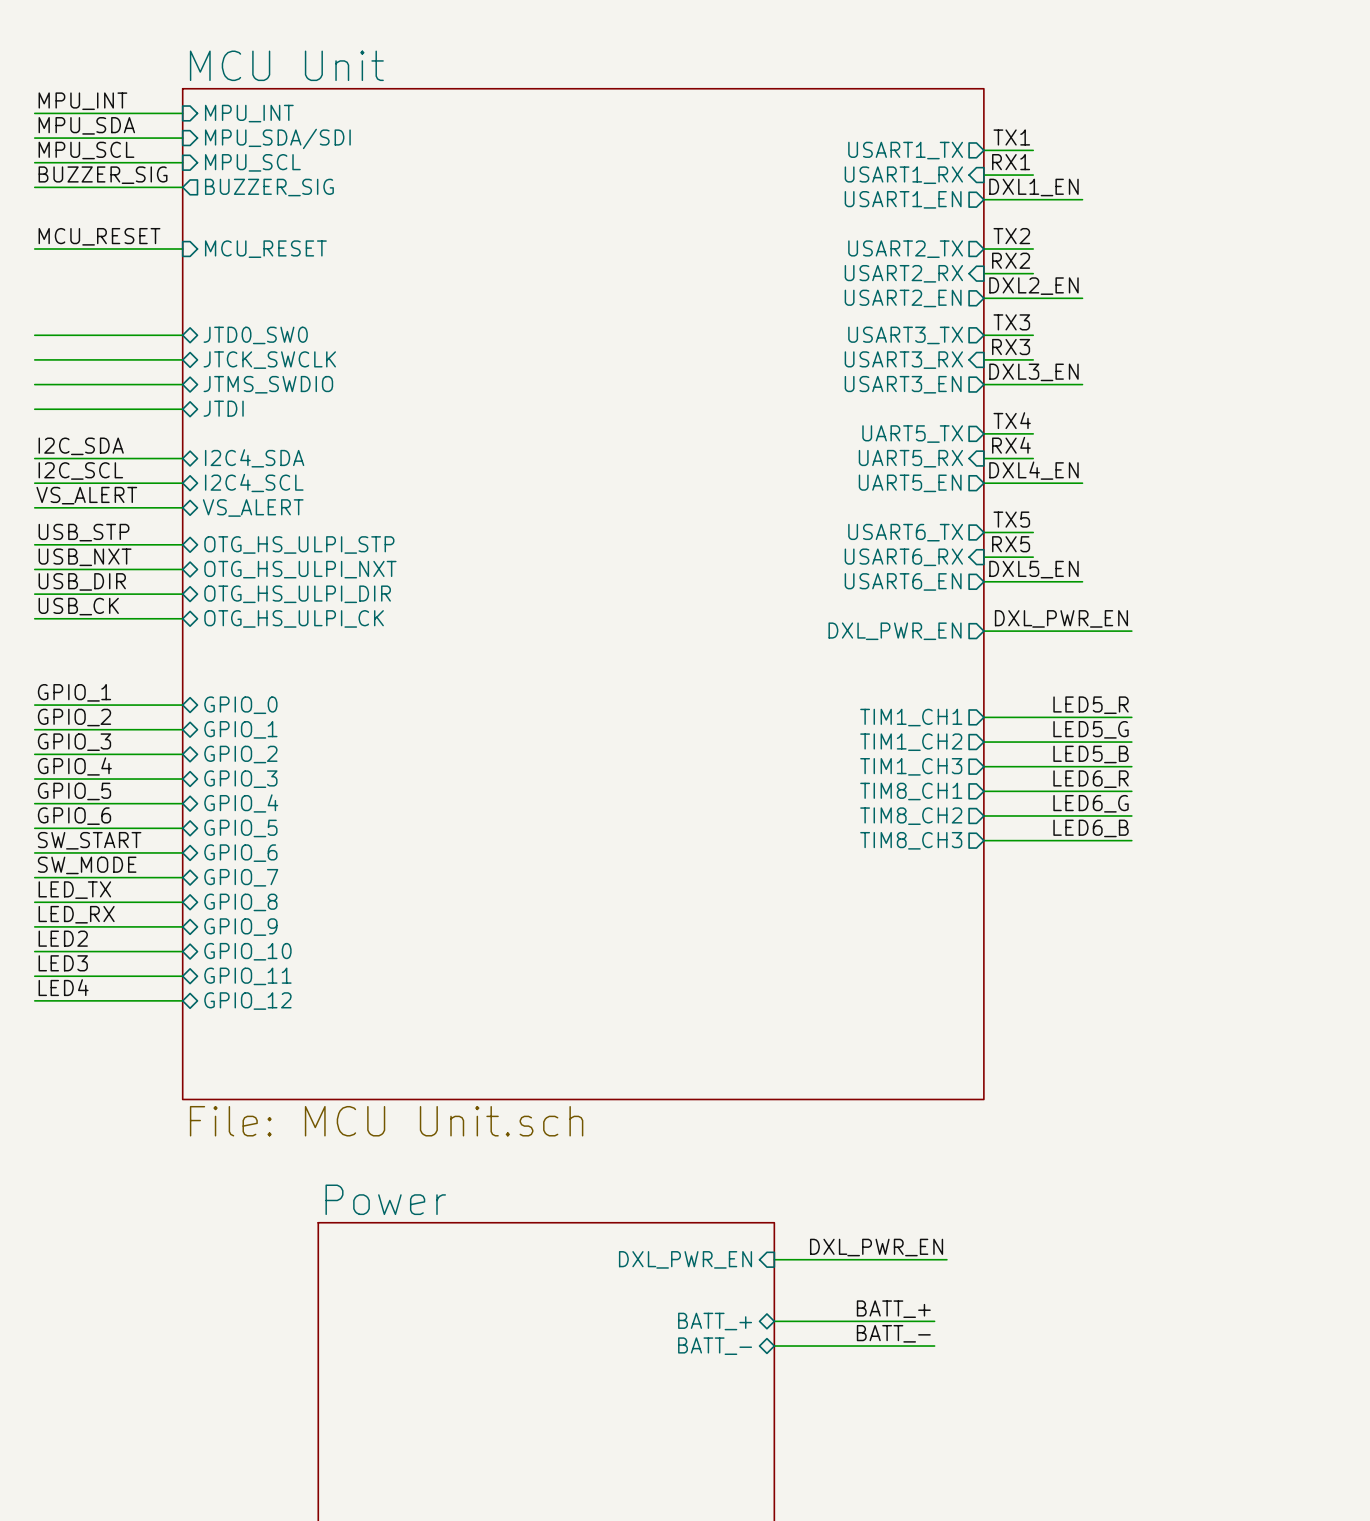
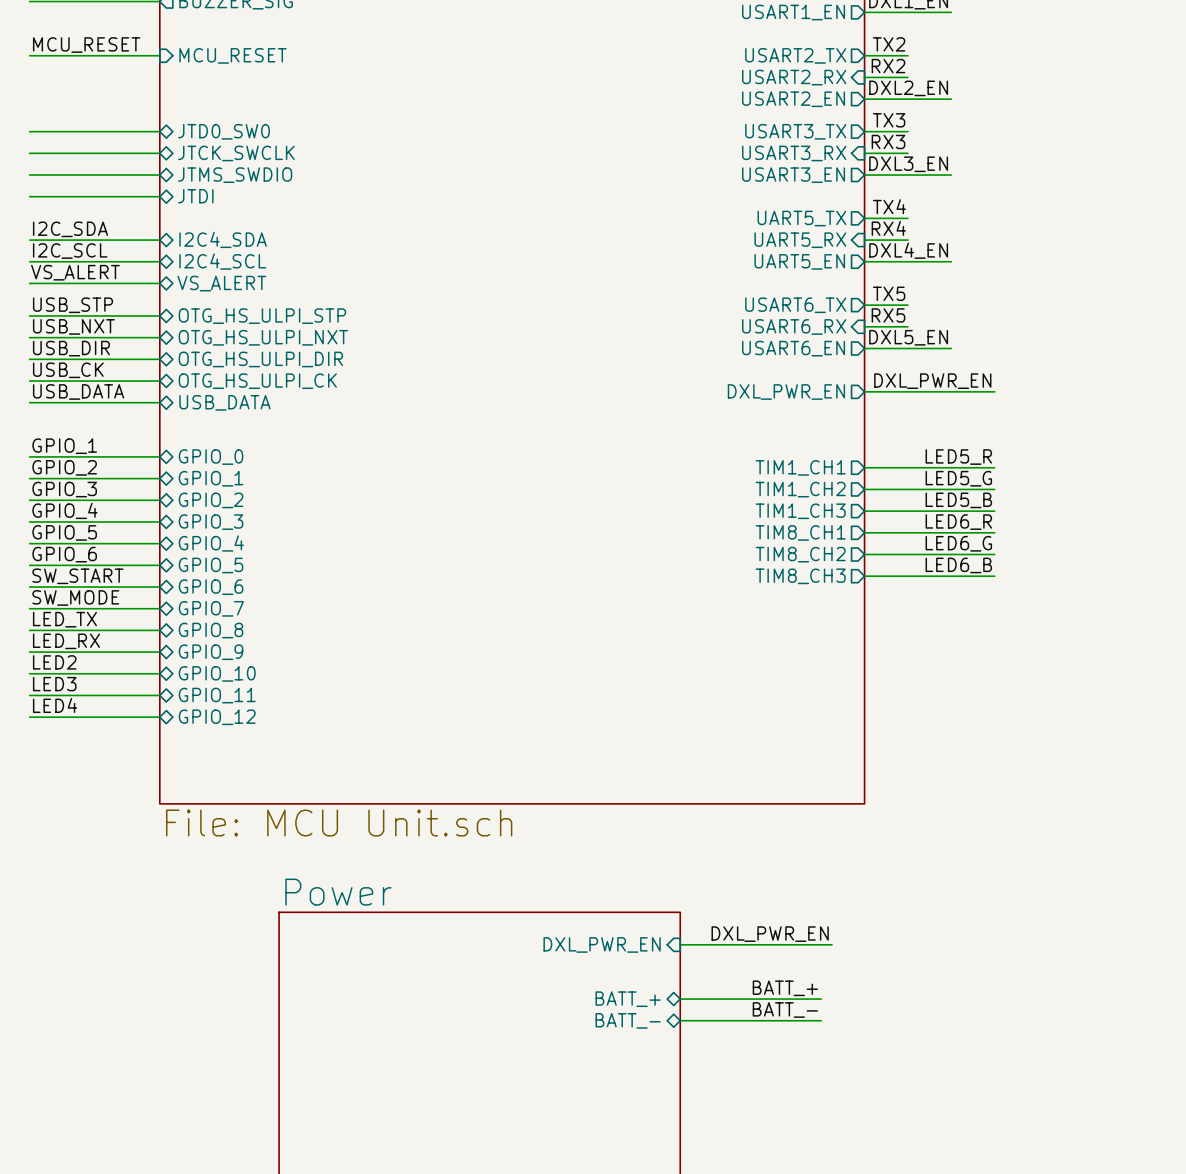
label: none -> USB_DATA (78, 391)
wire: none -> (29, 402) (159, 402)
sheet pin: none -> USB_DATA (224, 402)

